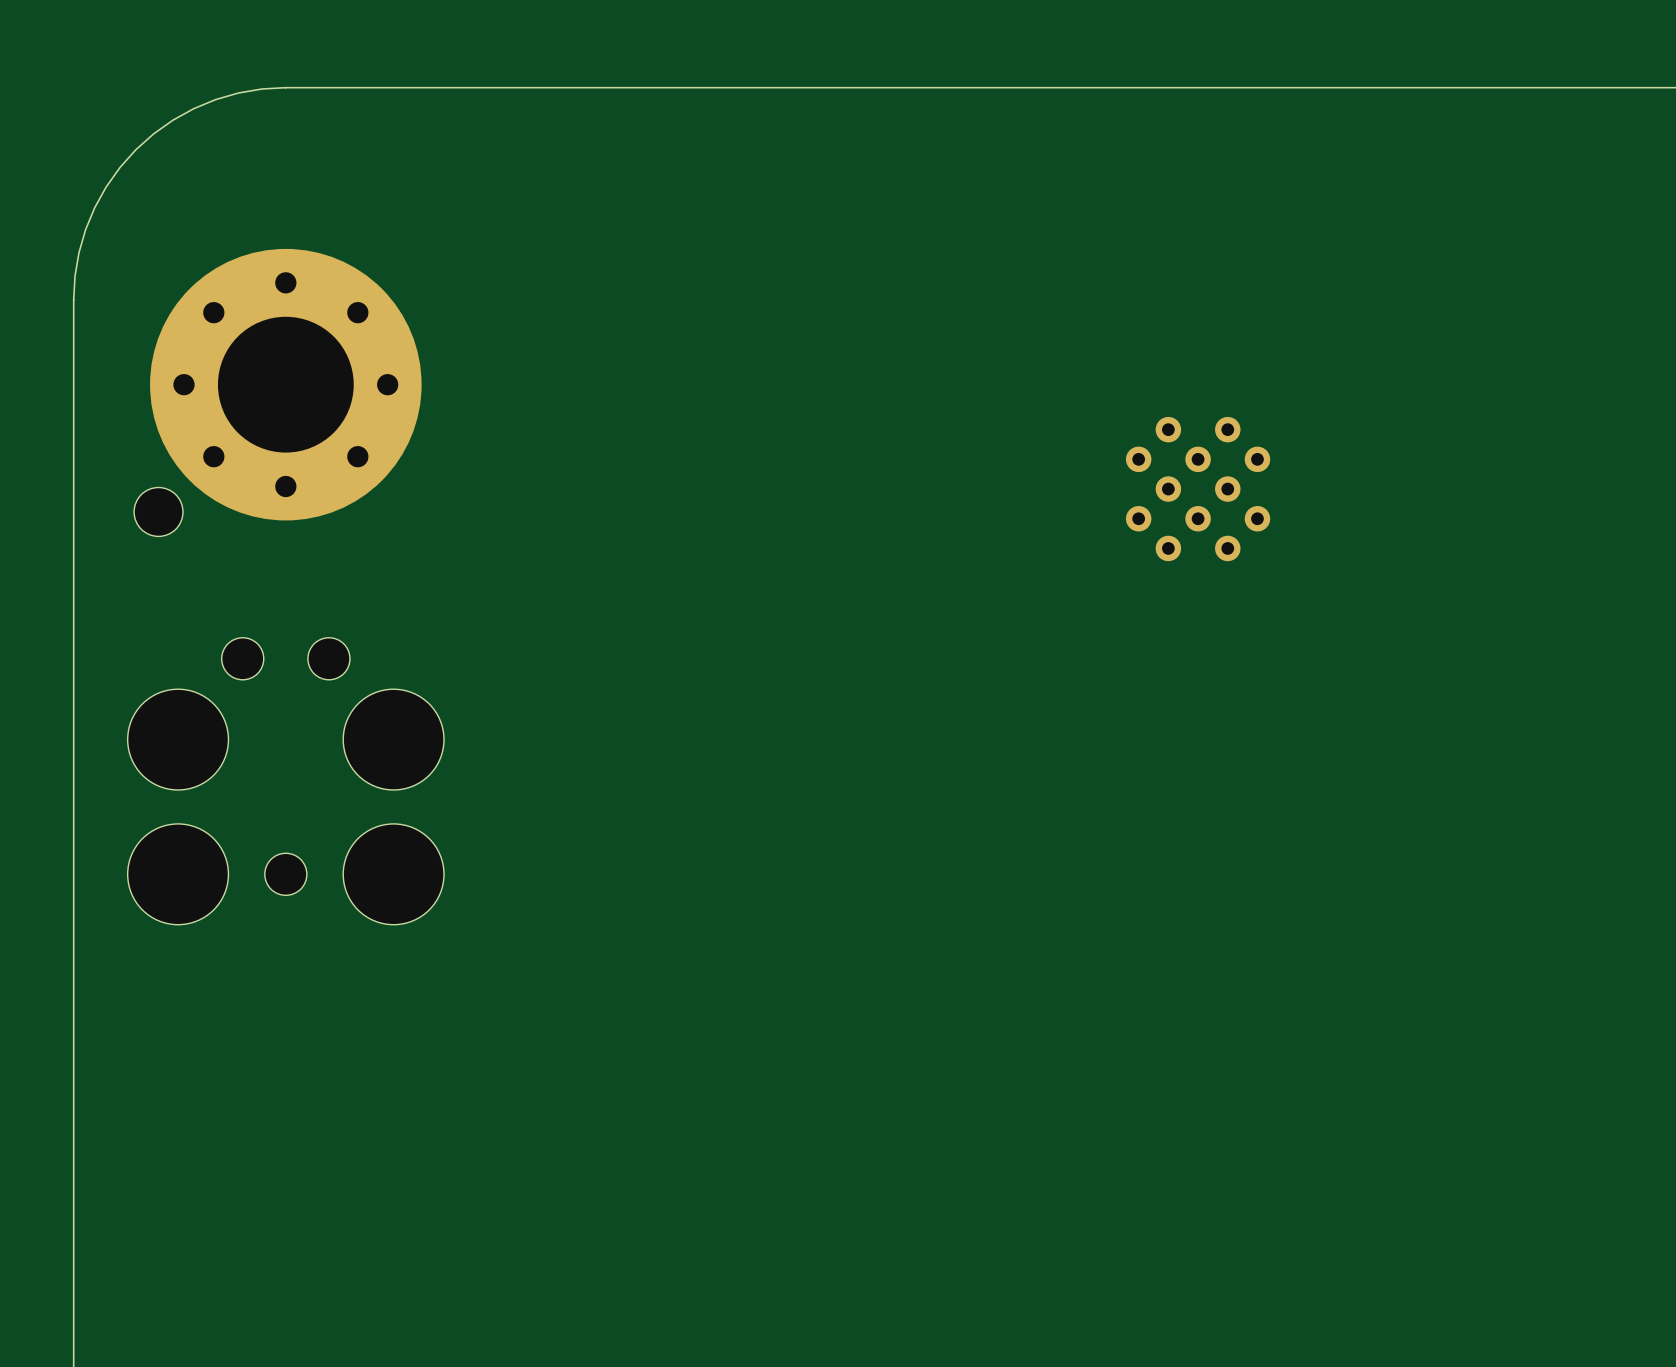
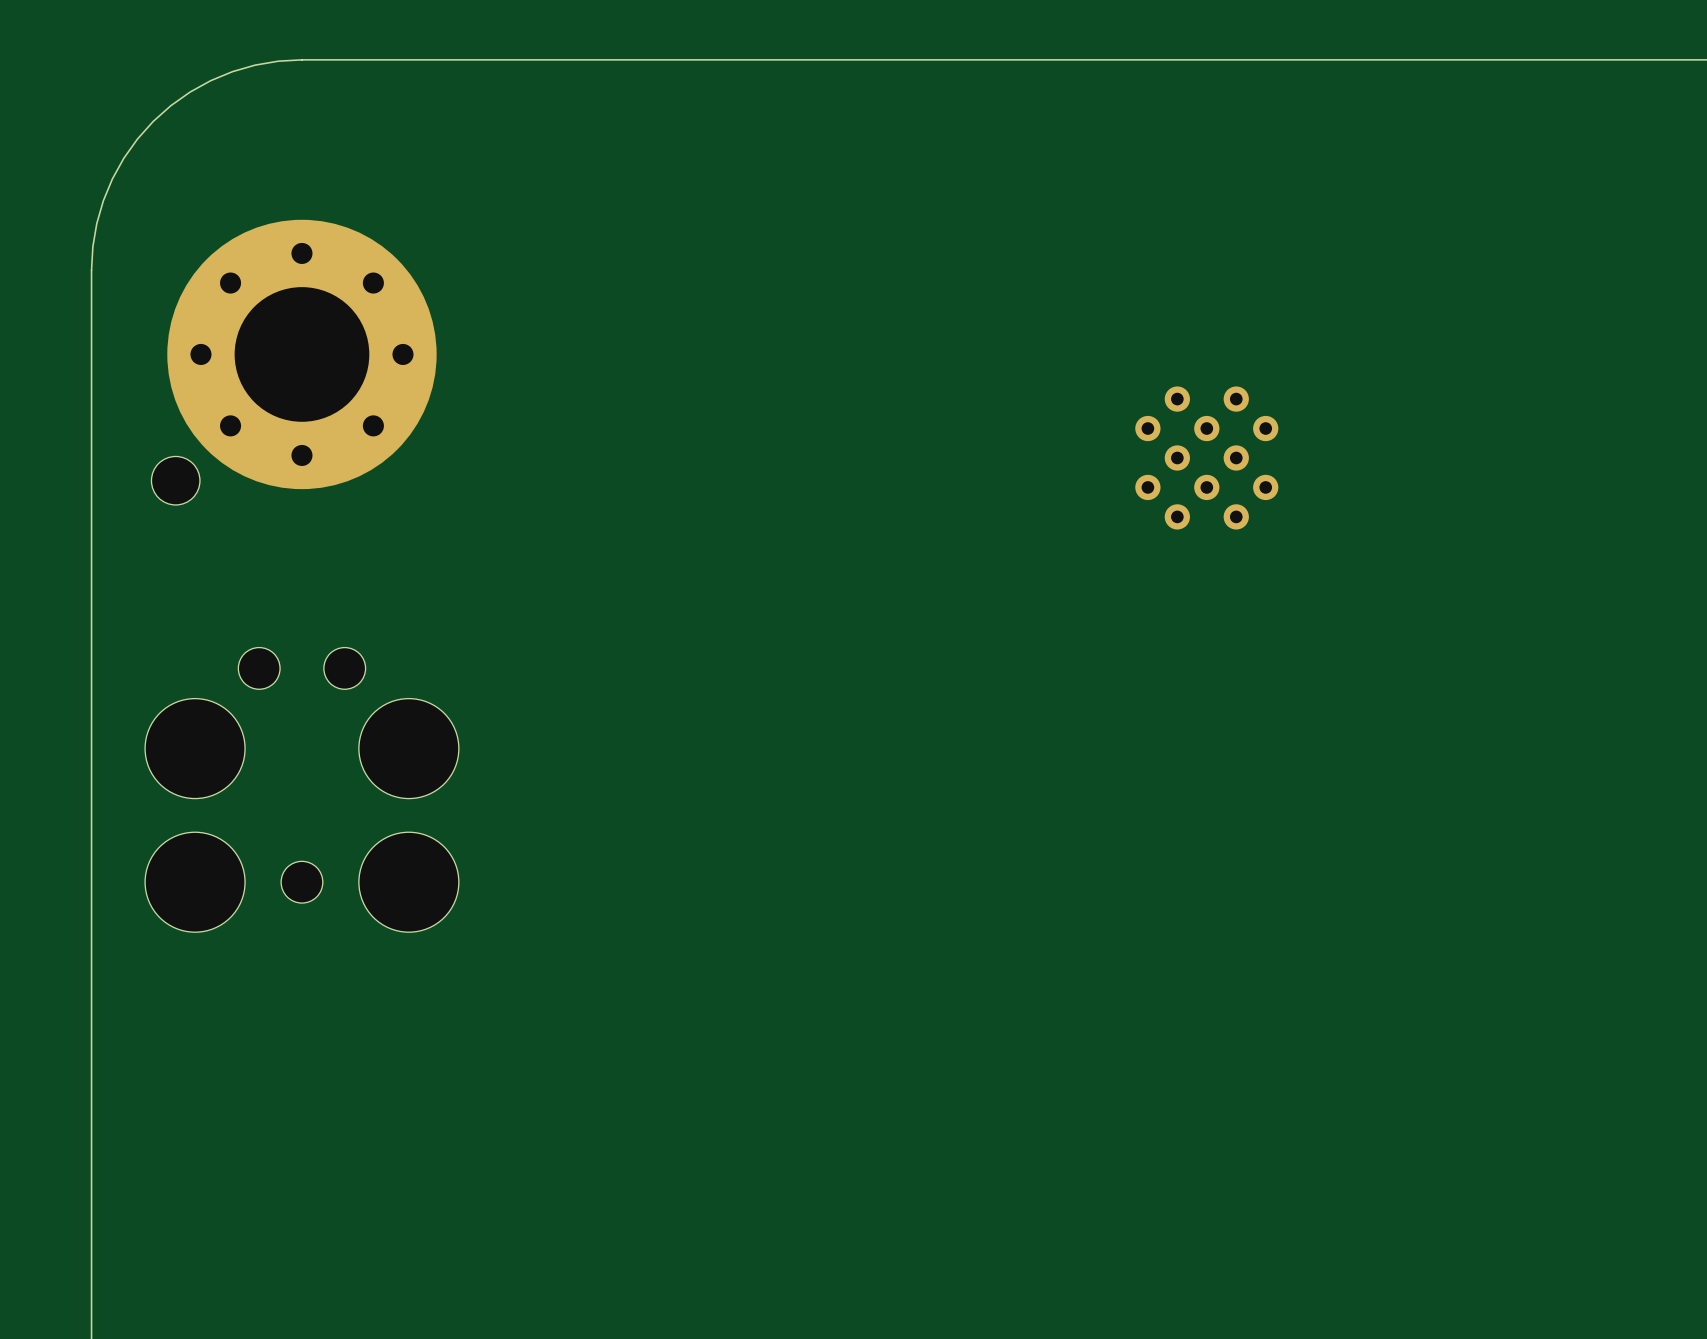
part position: (285, 781) -> (301, 789)

